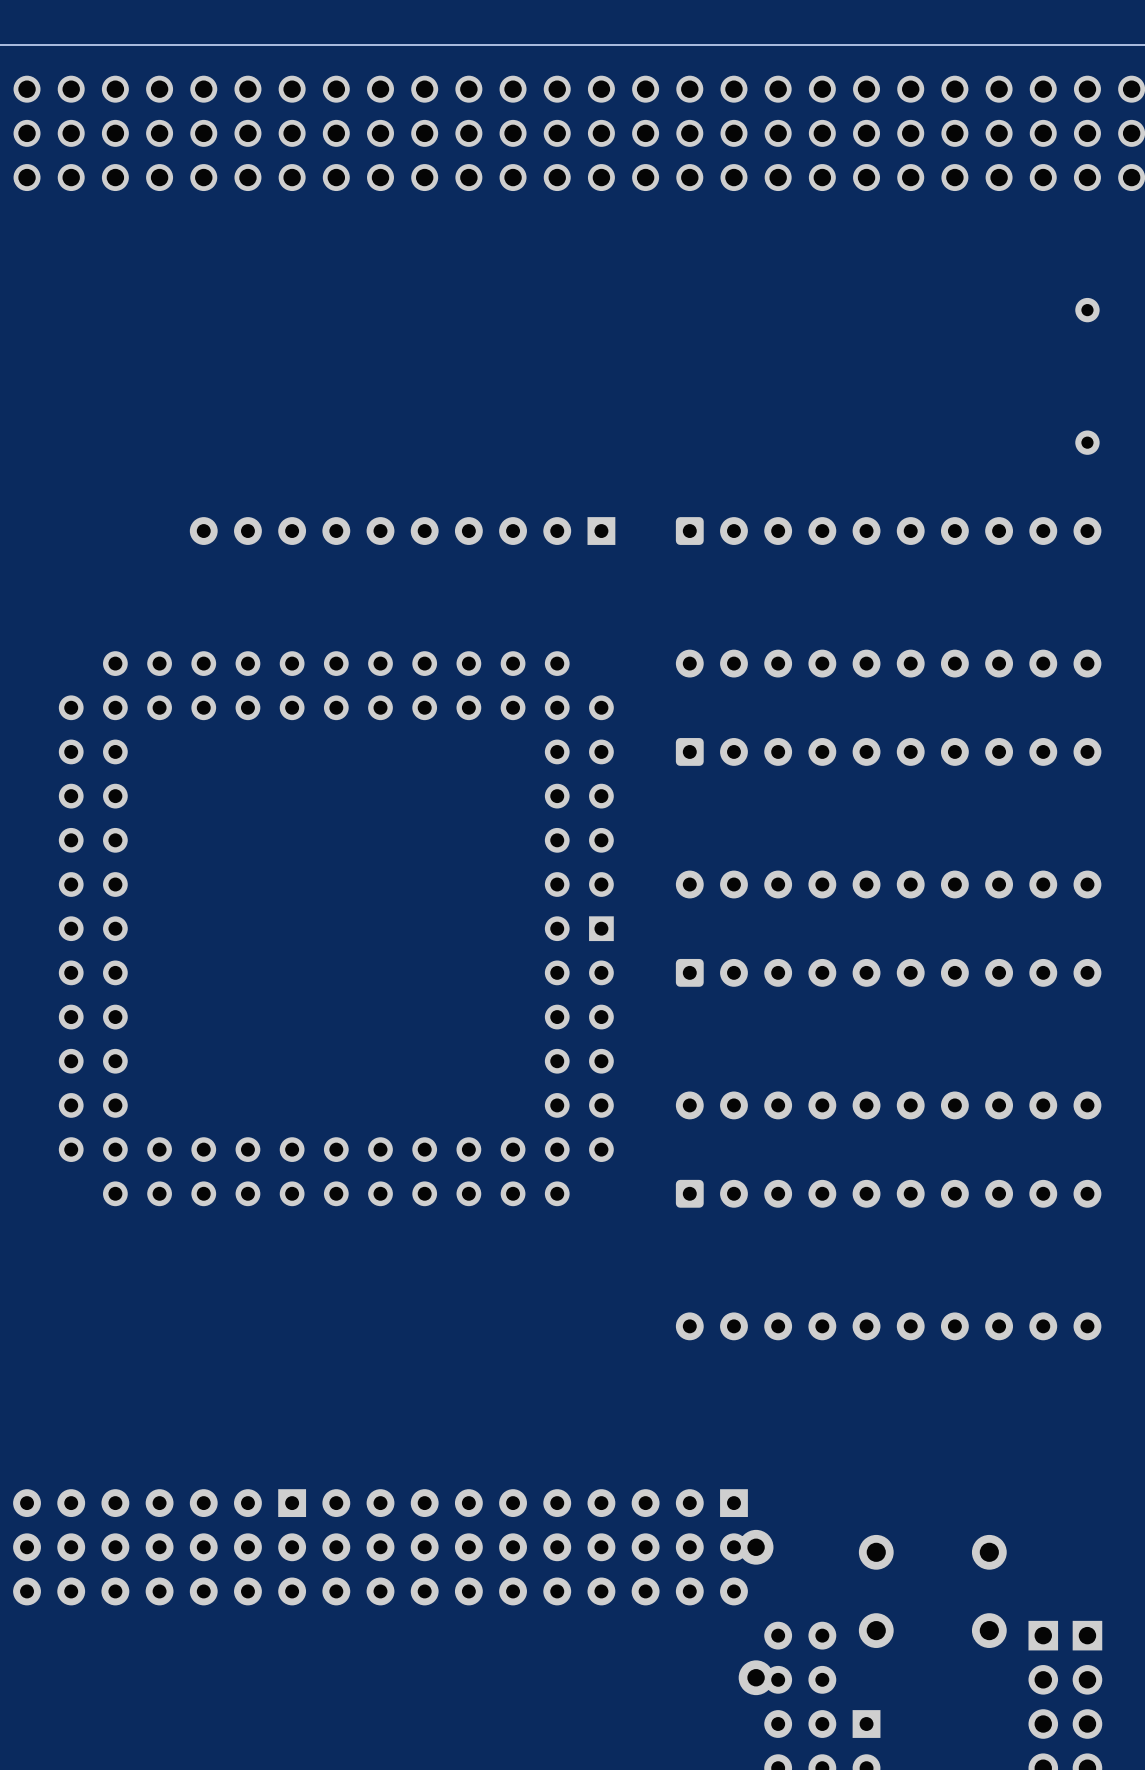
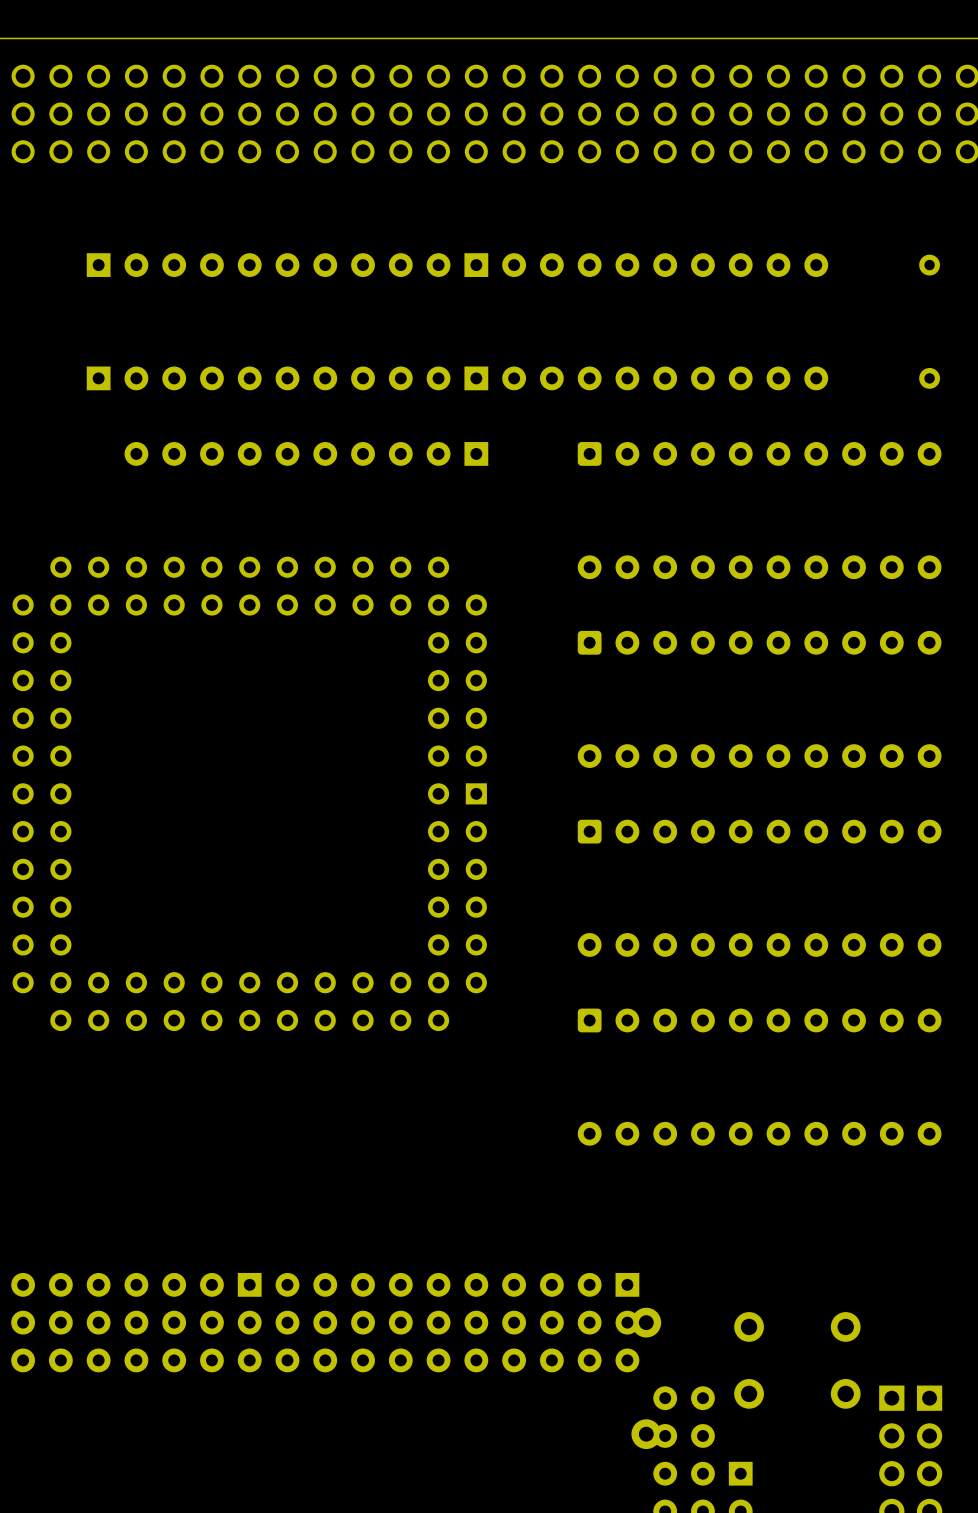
part: none -> (268, 265)
part: none -> (646, 265)
part: none -> (268, 378)
part: none -> (646, 378)
part position: (402, 531) -> (306, 453)
part position: (336, 928) -> (249, 793)

